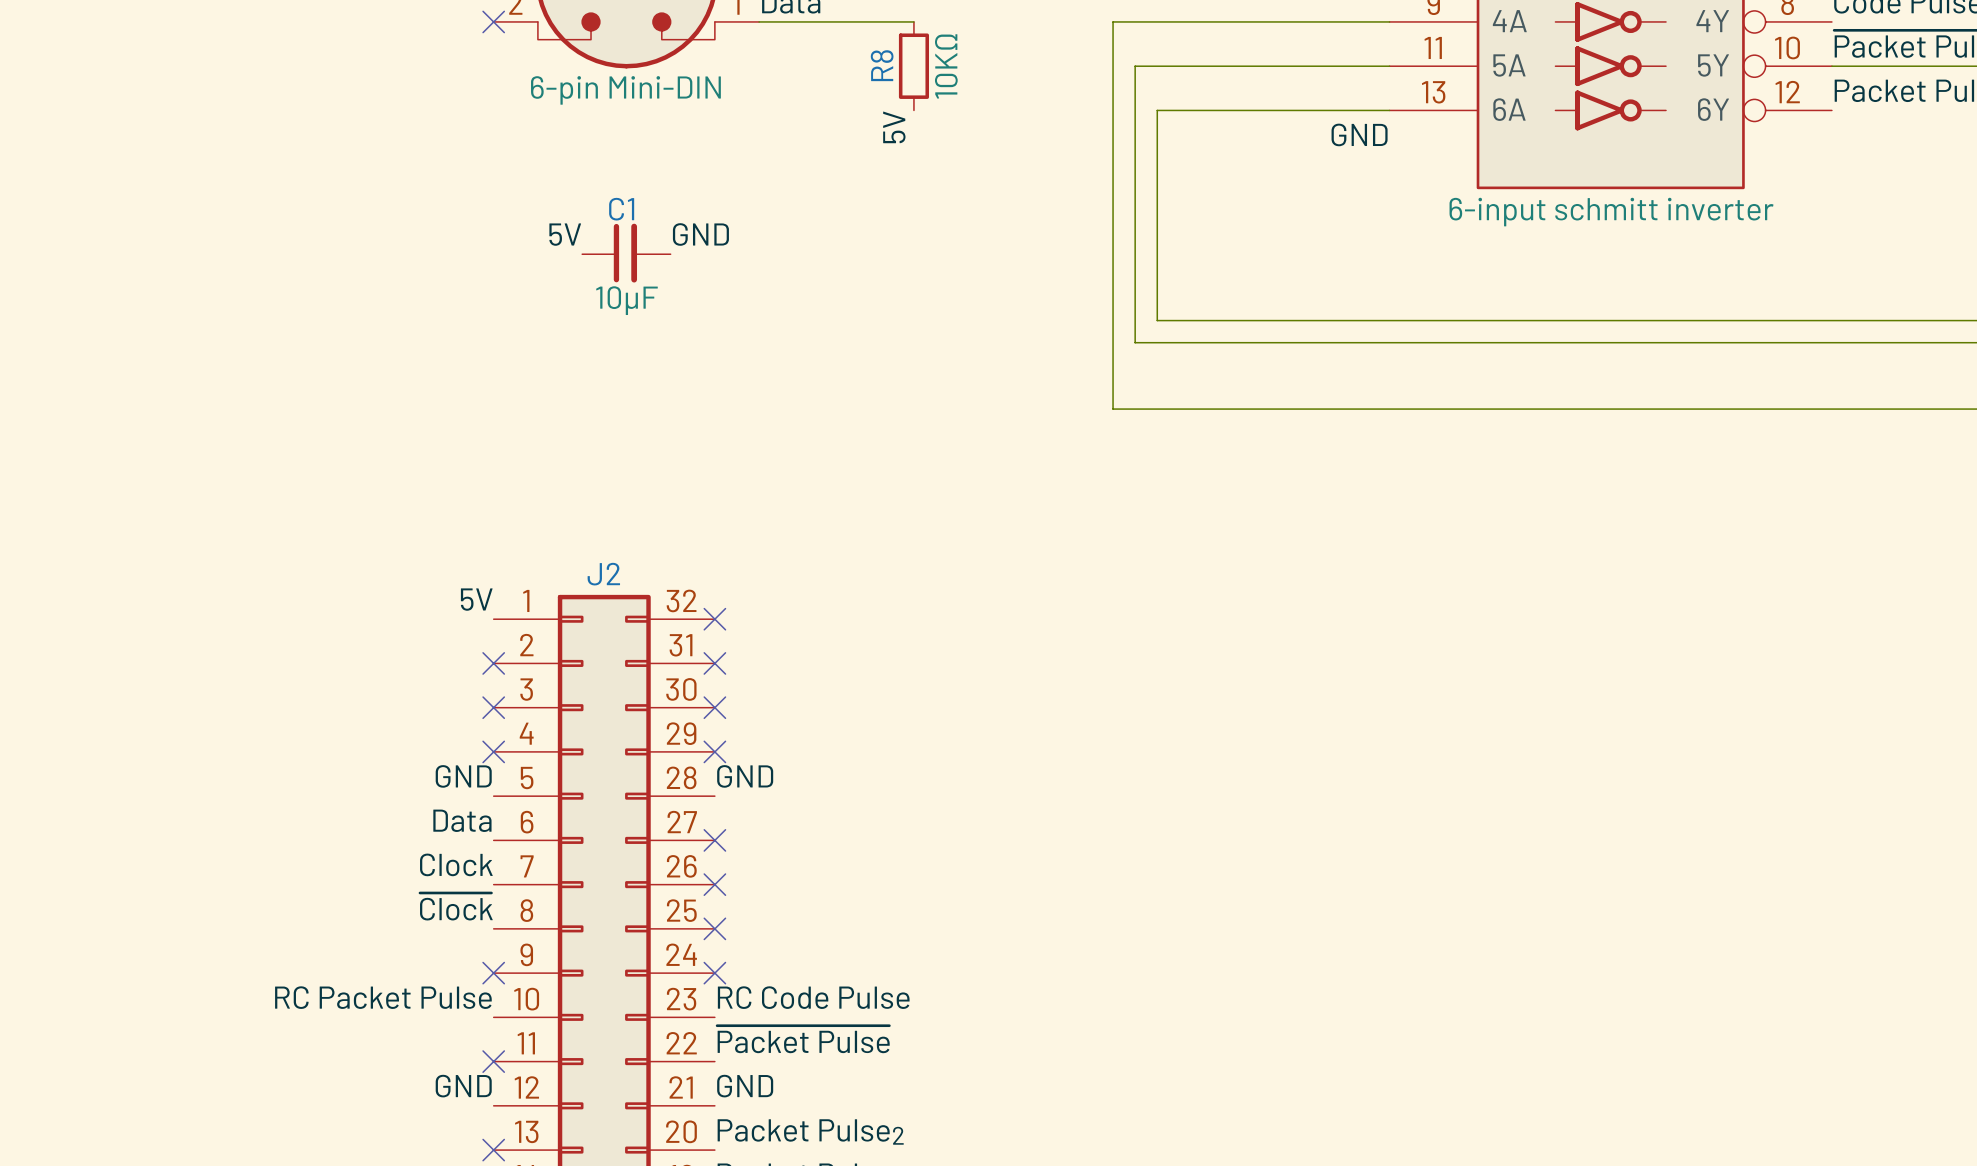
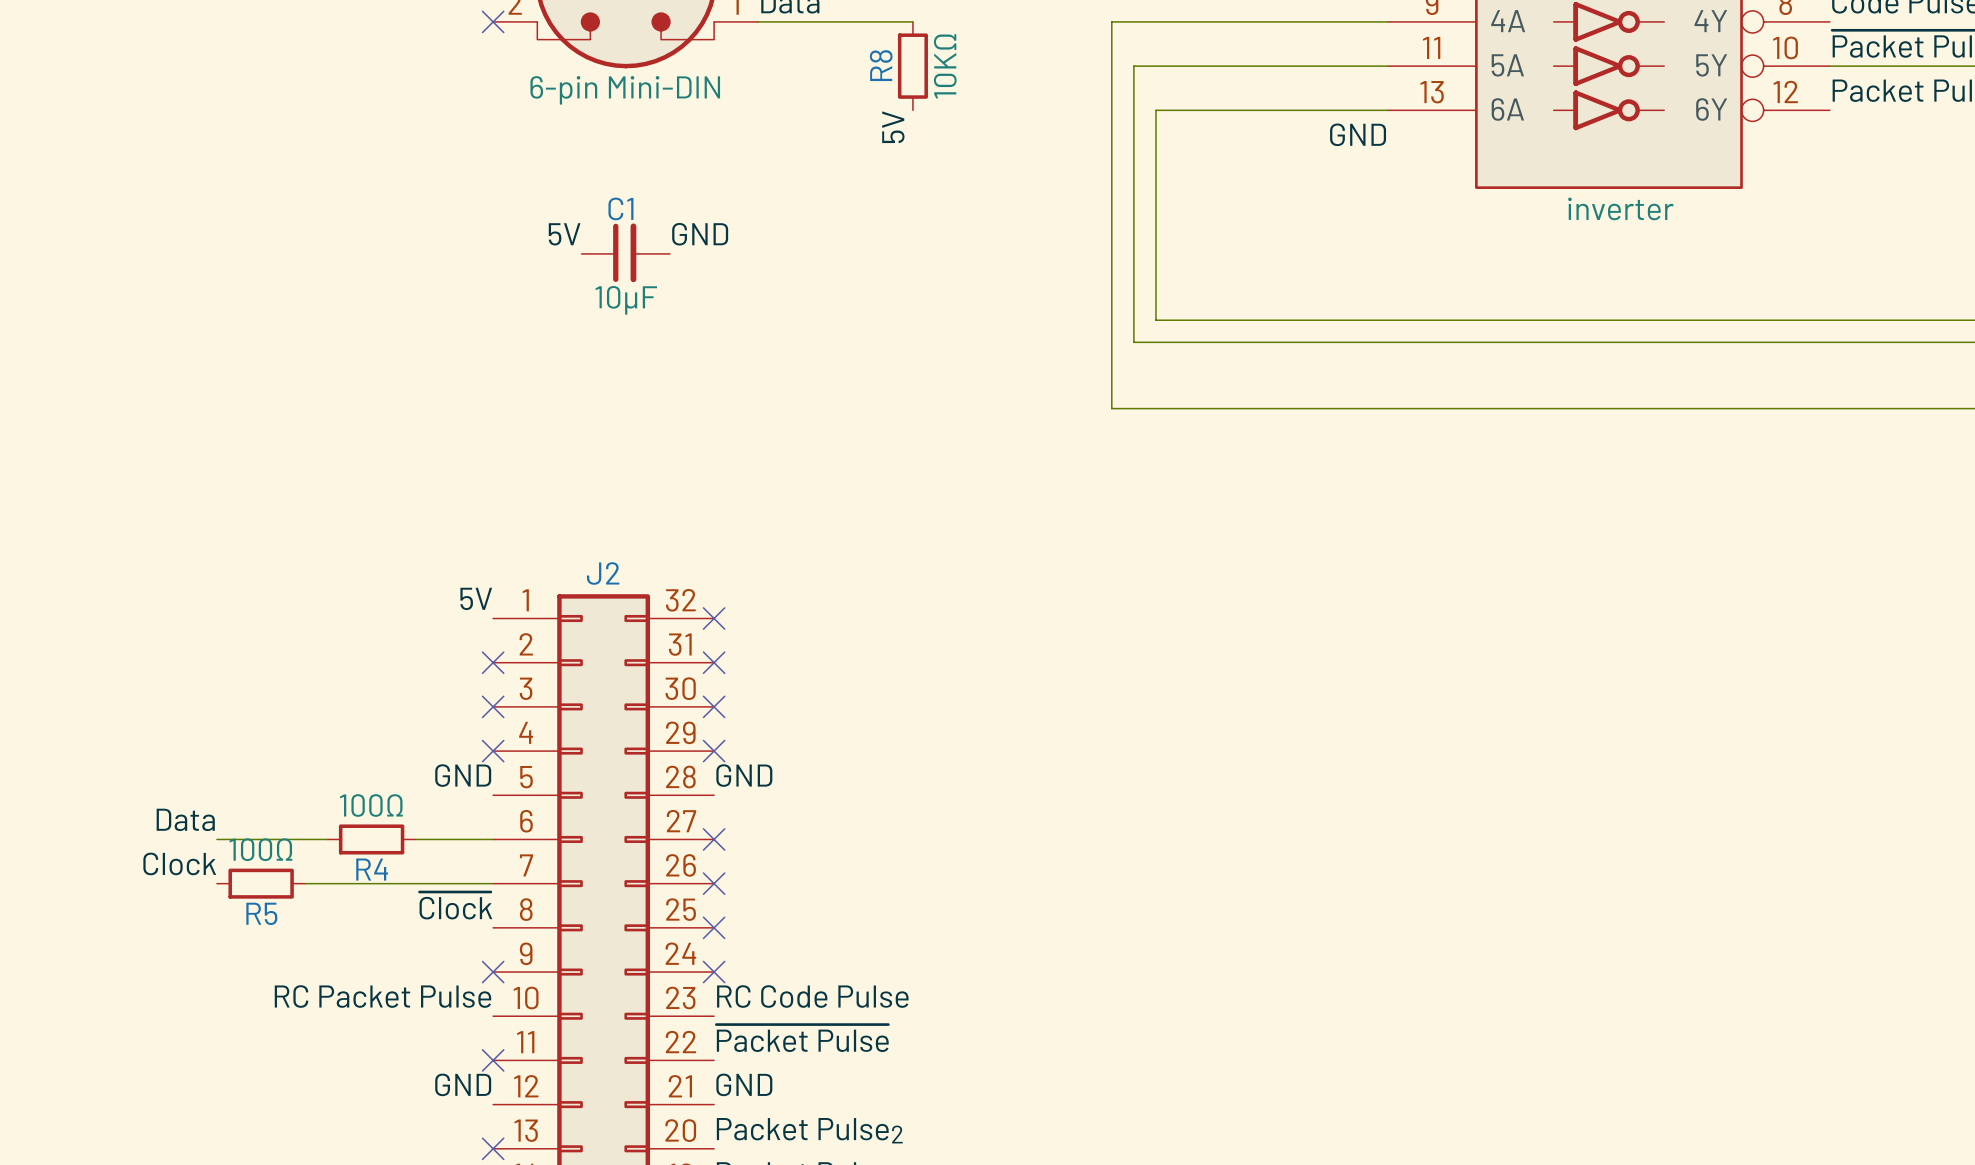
part text: 6-input schmitt inverter (1611, 212) -> inverter (1620, 208)
label position: Data (462, 820) -> Data (185, 819)
wire: none -> (216, 839) (327, 839)
R4: none -> 100Ω (371, 839)
wire: none -> (415, 839) (493, 839)
label position: Clock (456, 864) -> Clock (179, 863)
R5: none -> 100Ω (261, 883)
wire: none -> (305, 883) (493, 883)

